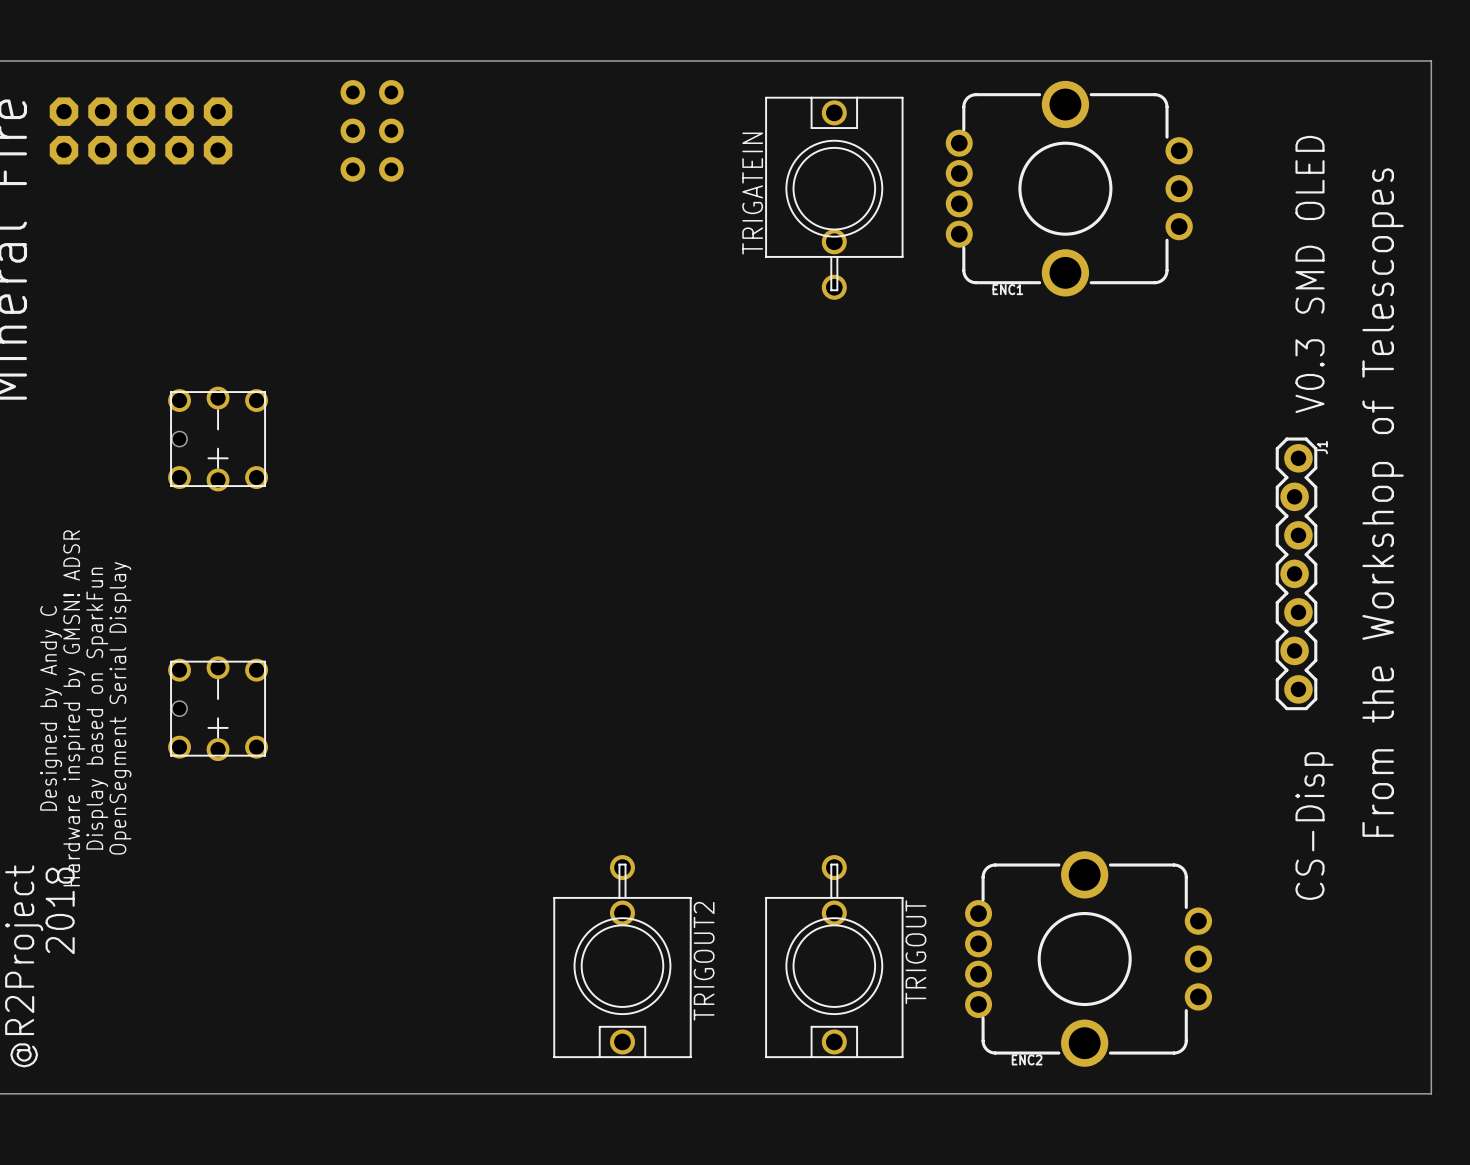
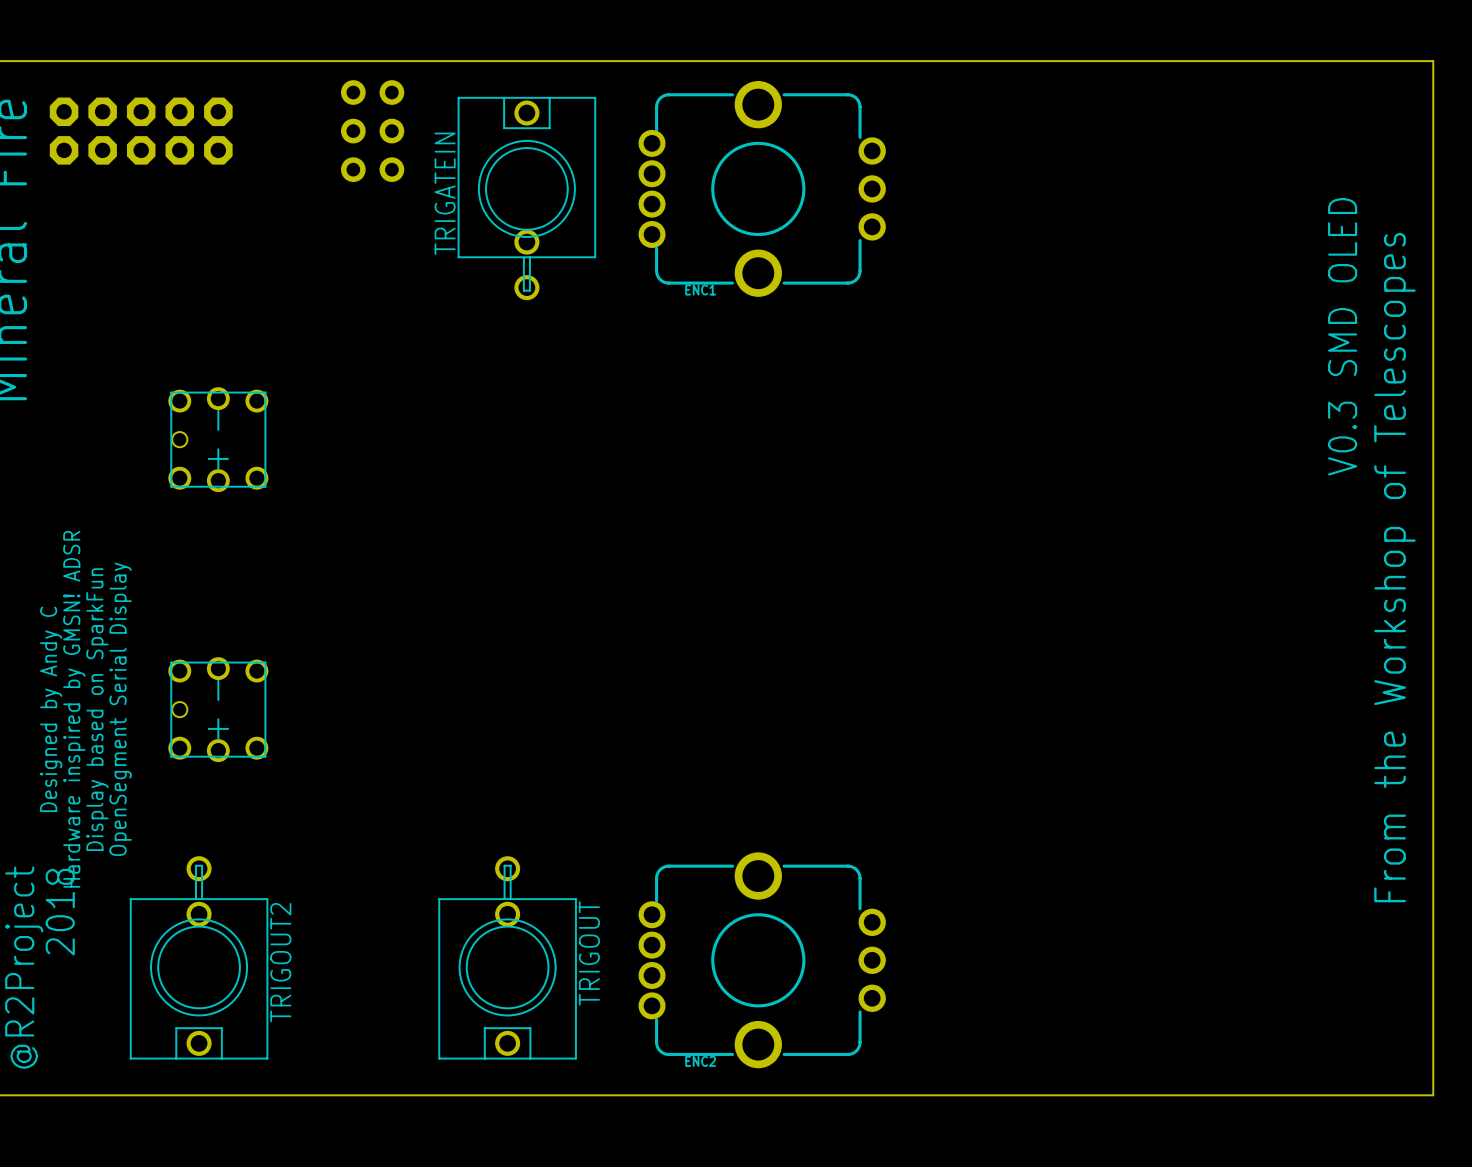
ENC1 position: (1069, 188) -> (762, 188)
TRIGATEIN position: (834, 198) -> (526, 198)
text position: V0.3 SMD OLED (1310, 274) -> V0.3 SMD OLED (1342, 336)
text: From the Workshop of Telescopes (1383, 502) -> none
text: none -> From the Workshop of Telescopes (1394, 567)
J1: (1296, 573) -> none
text: CS-Disp (1314, 826) -> none
TRIGOUT2 position: (622, 956) -> (199, 957)
TRIGOUT position: (834, 956) -> (507, 957)
ENC2 position: (1088, 959) -> (762, 960)

